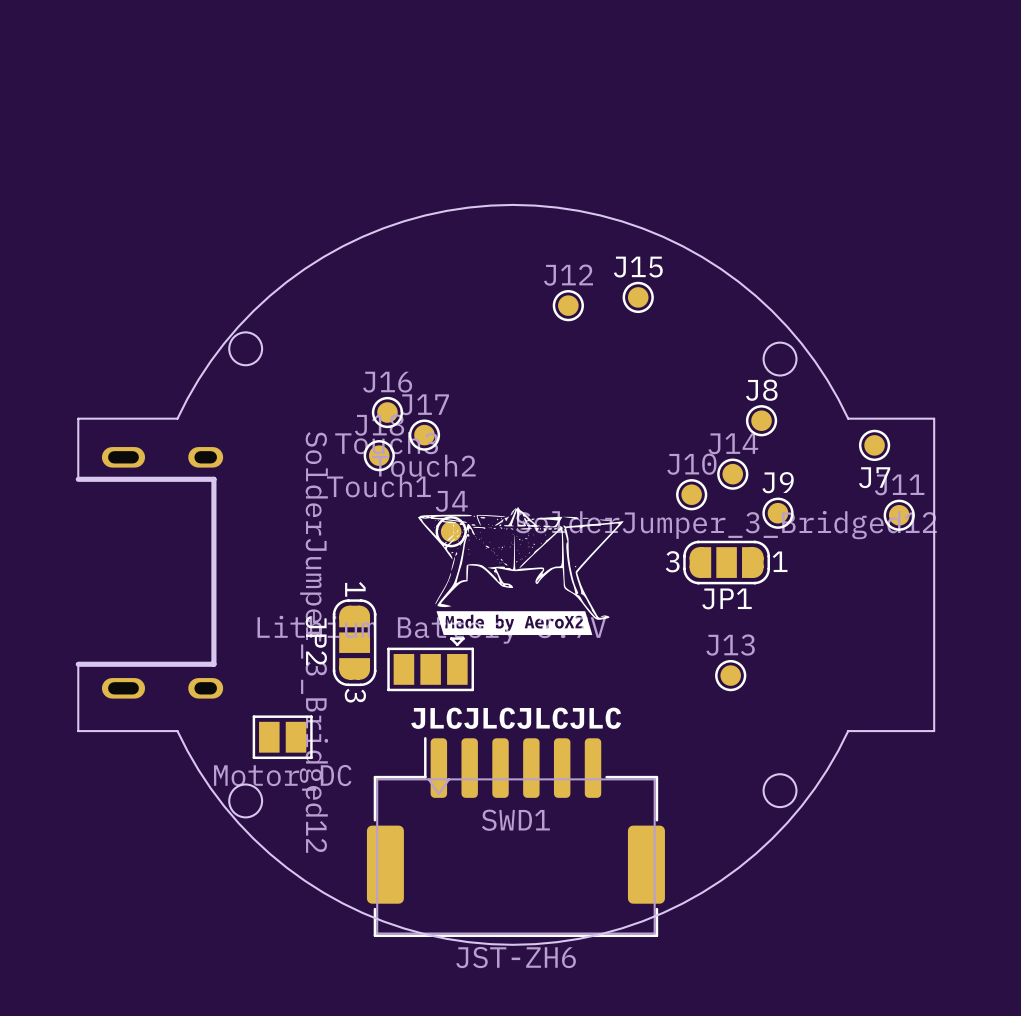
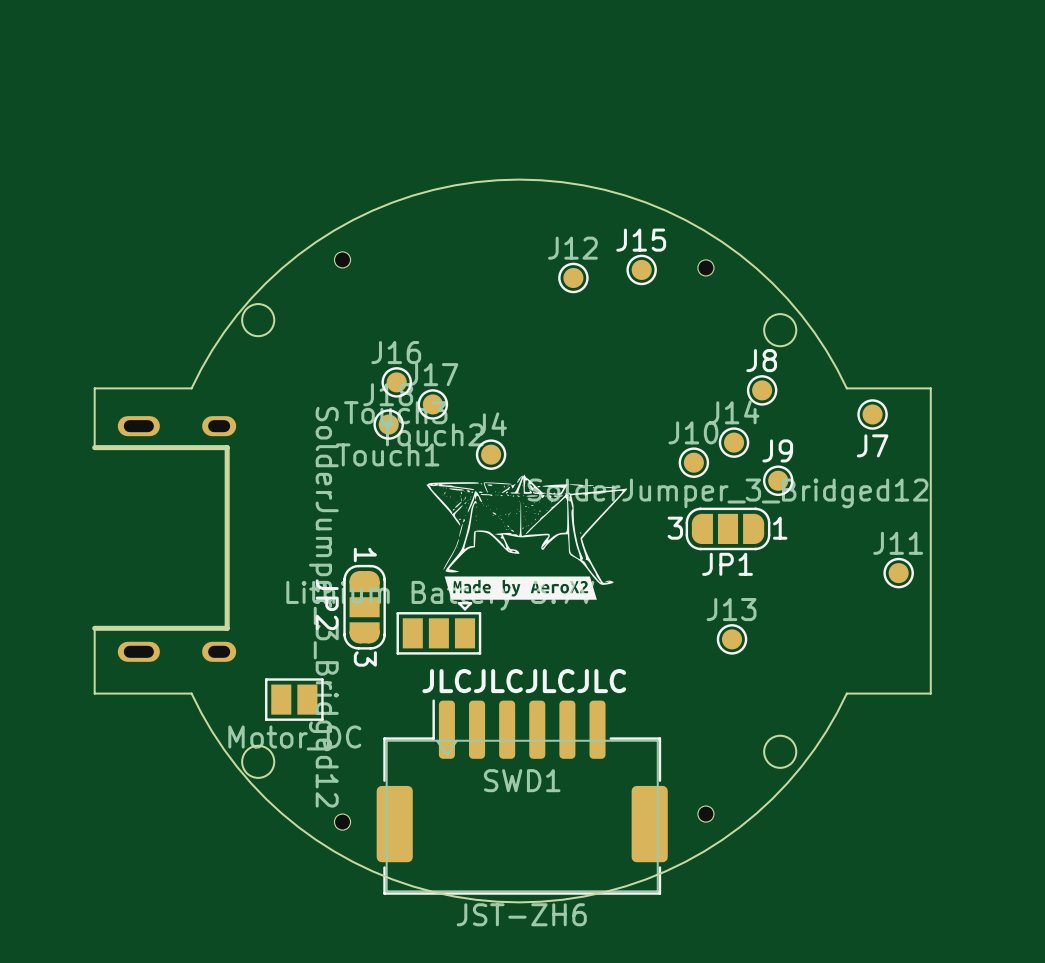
part: none -> (342, 259)
part: none -> (705, 267)
J11 position: (899, 515) -> (898, 573)
J4 position: (451, 531) -> (491, 454)
part: none -> (705, 814)
part: none -> (342, 822)

